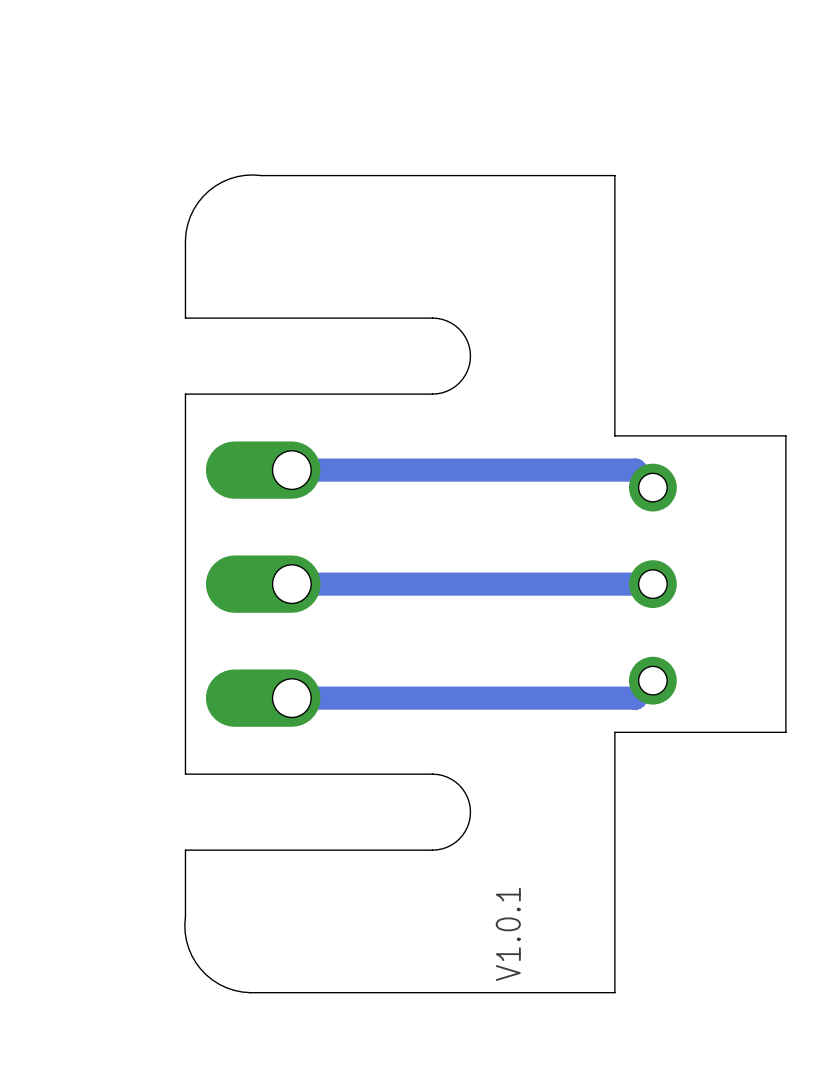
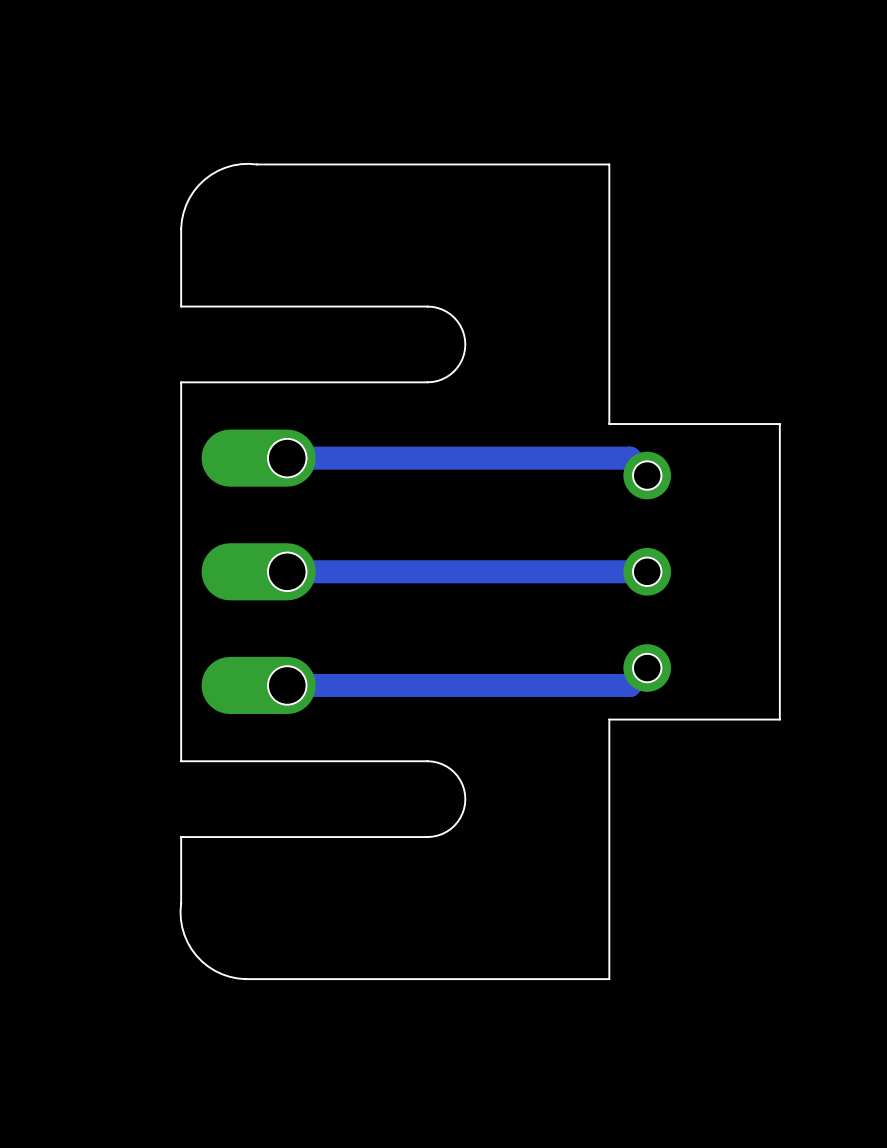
text: V1.0.1 (508, 934) -> none

